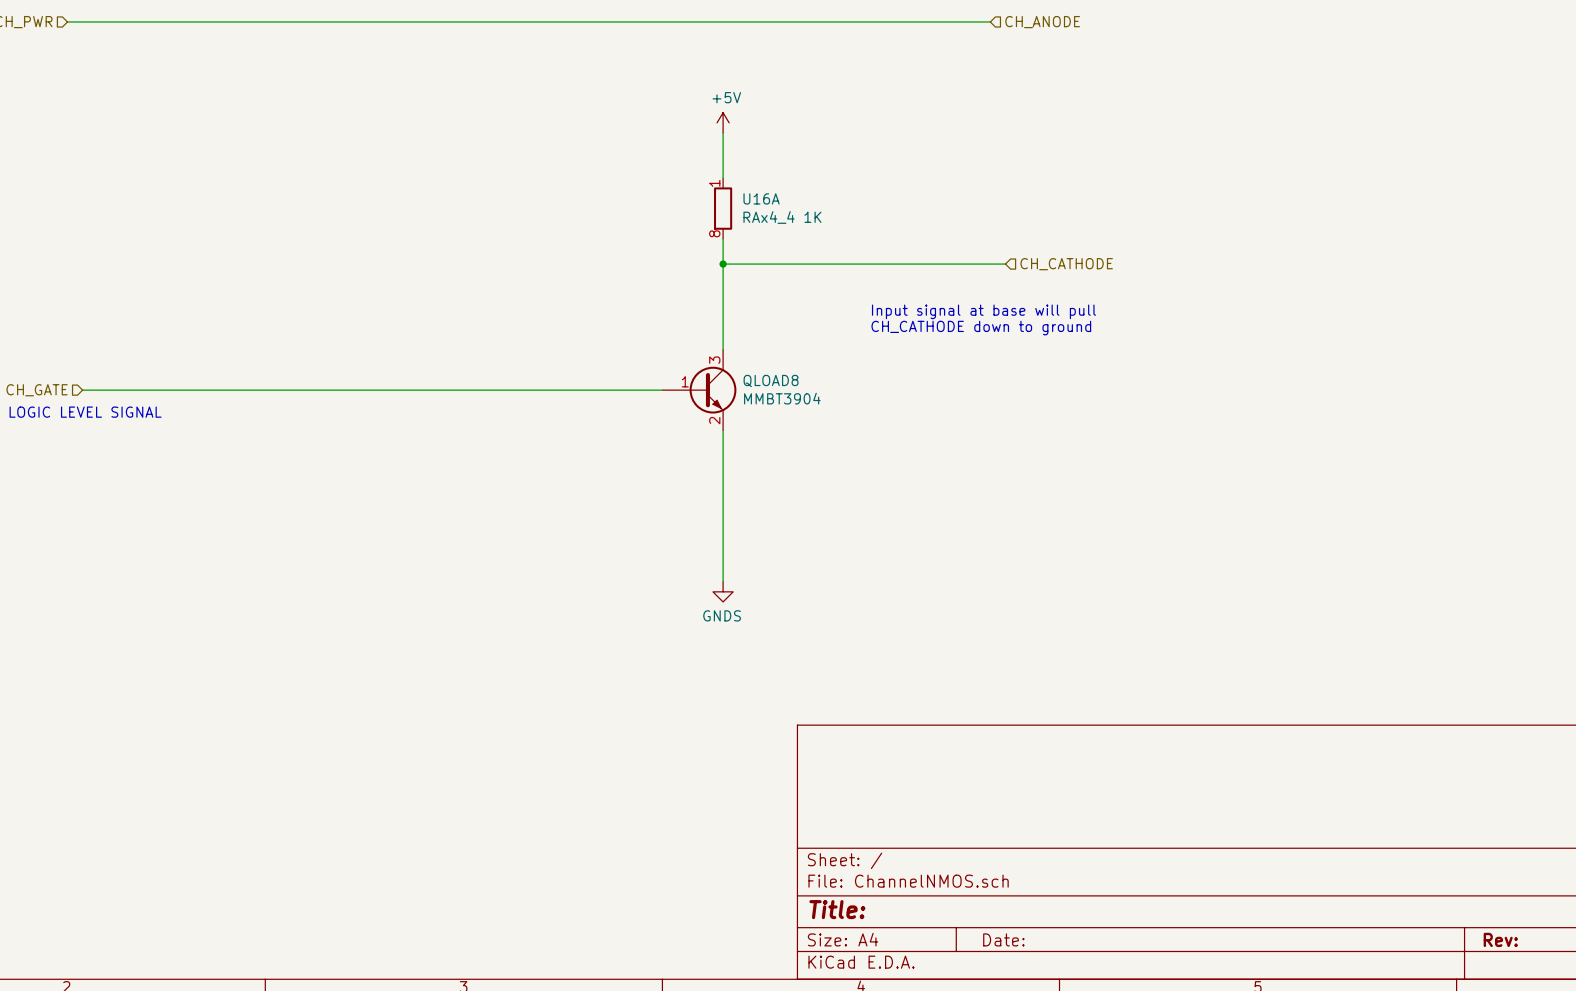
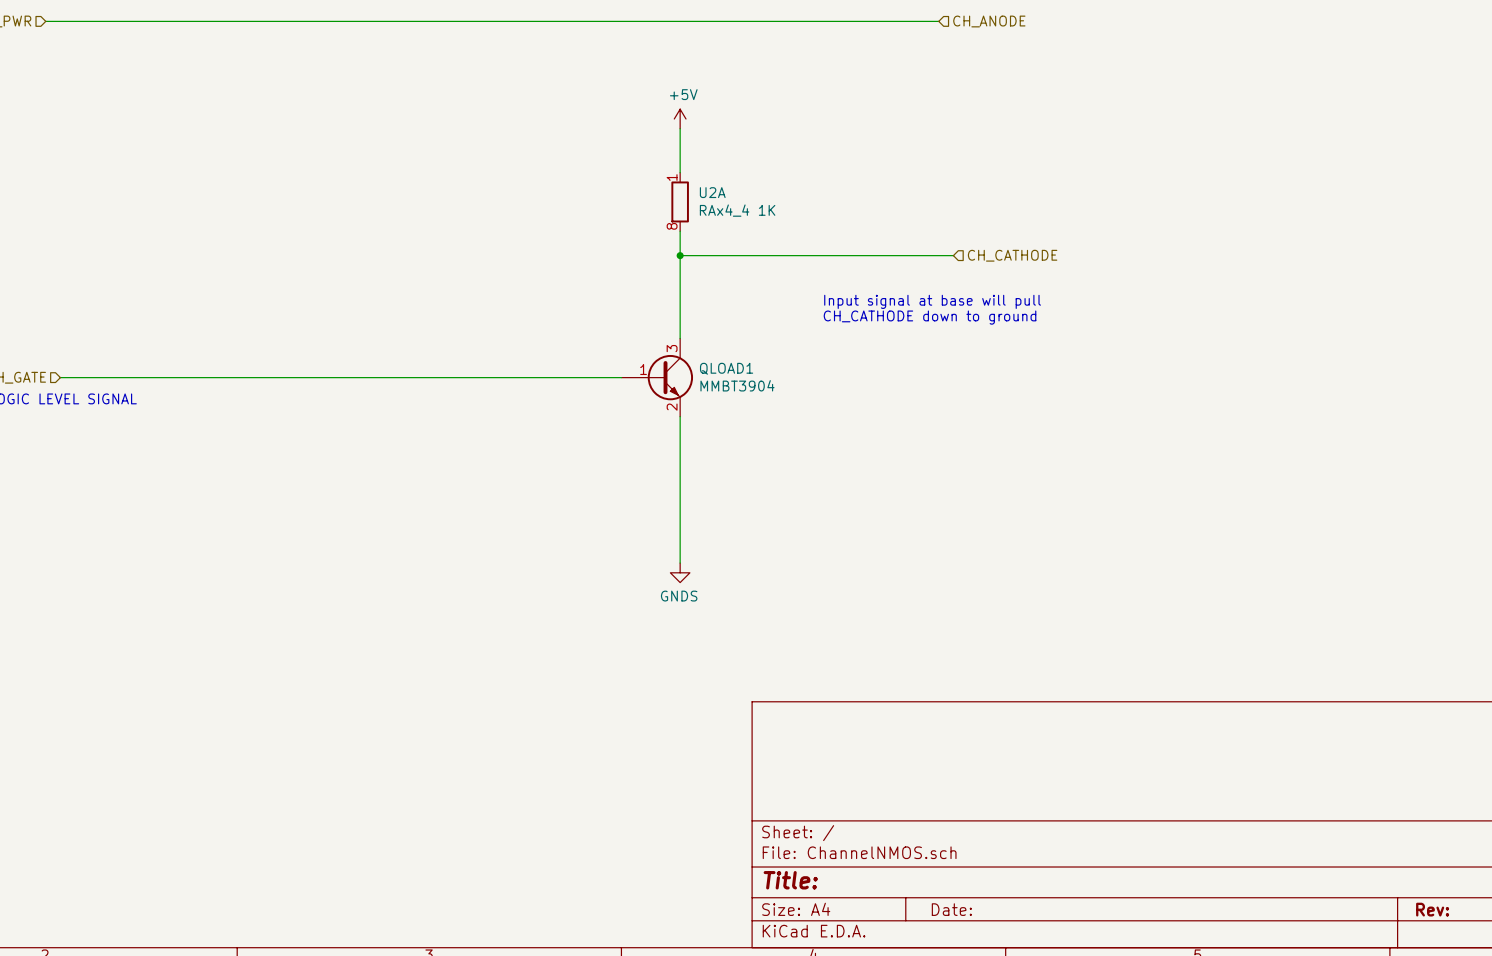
U16A name: U16A (761, 198) -> U2A (712, 192)
QLOAD8 name: QLOAD8 (771, 380) -> QLOAD1 (726, 368)

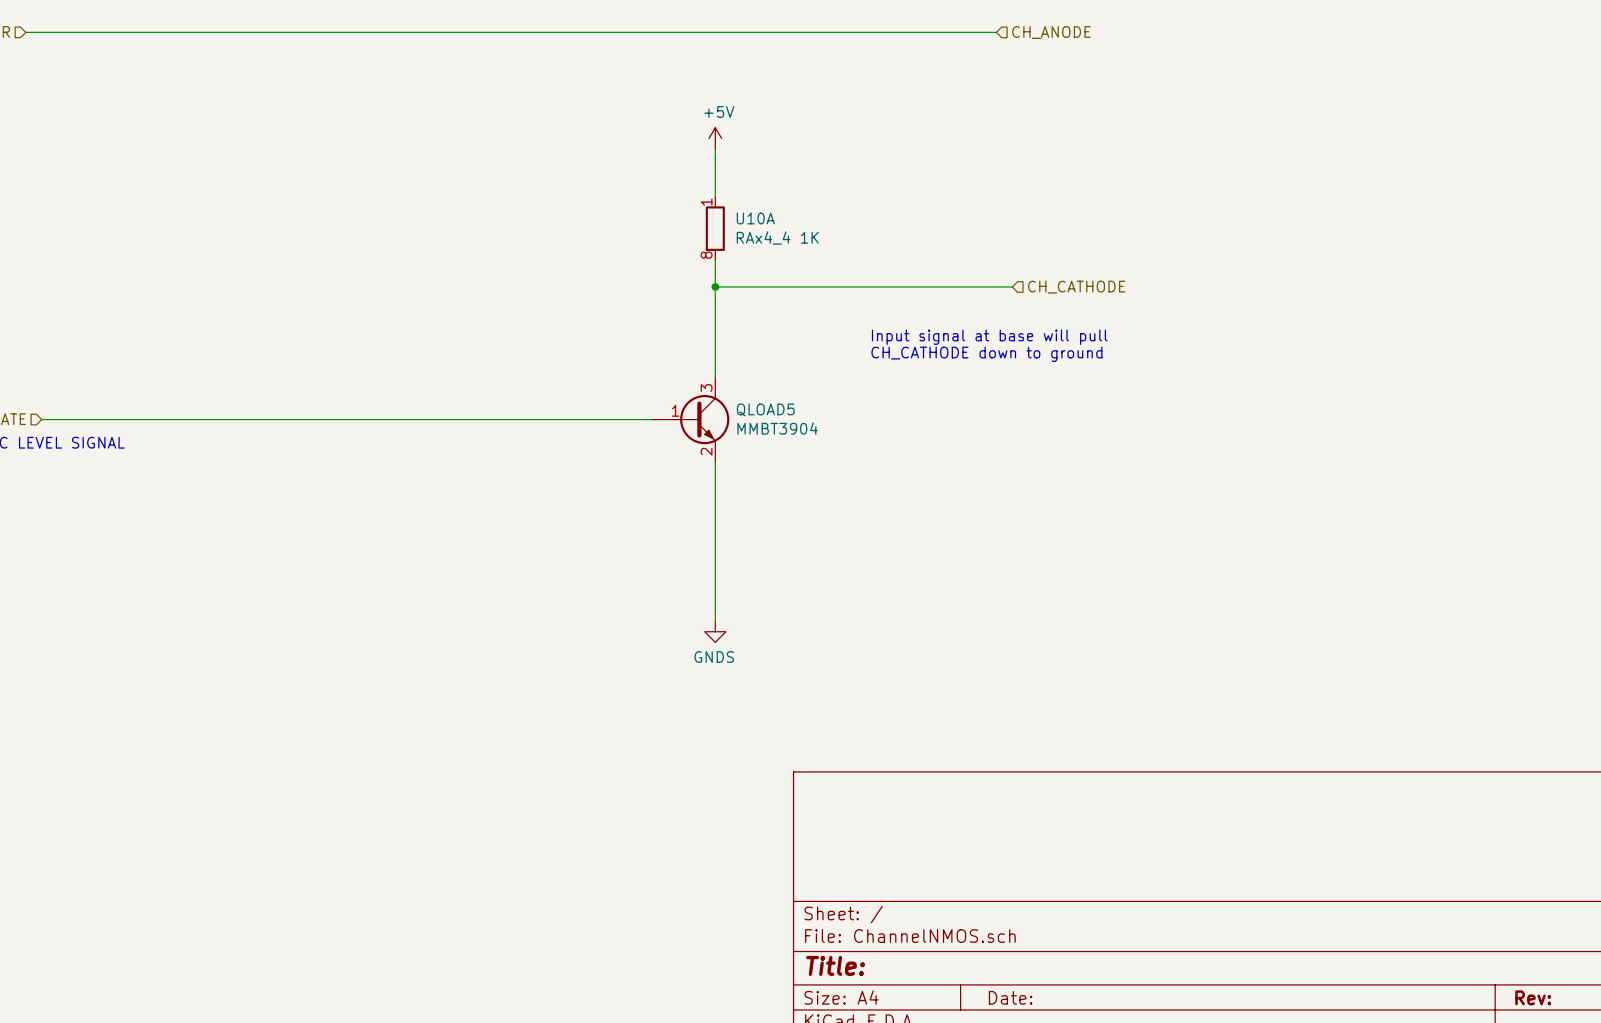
U2A name: U2A (712, 192) -> U10A (755, 218)
QLOAD1 name: QLOAD1 (726, 368) -> QLOAD5 (765, 409)

